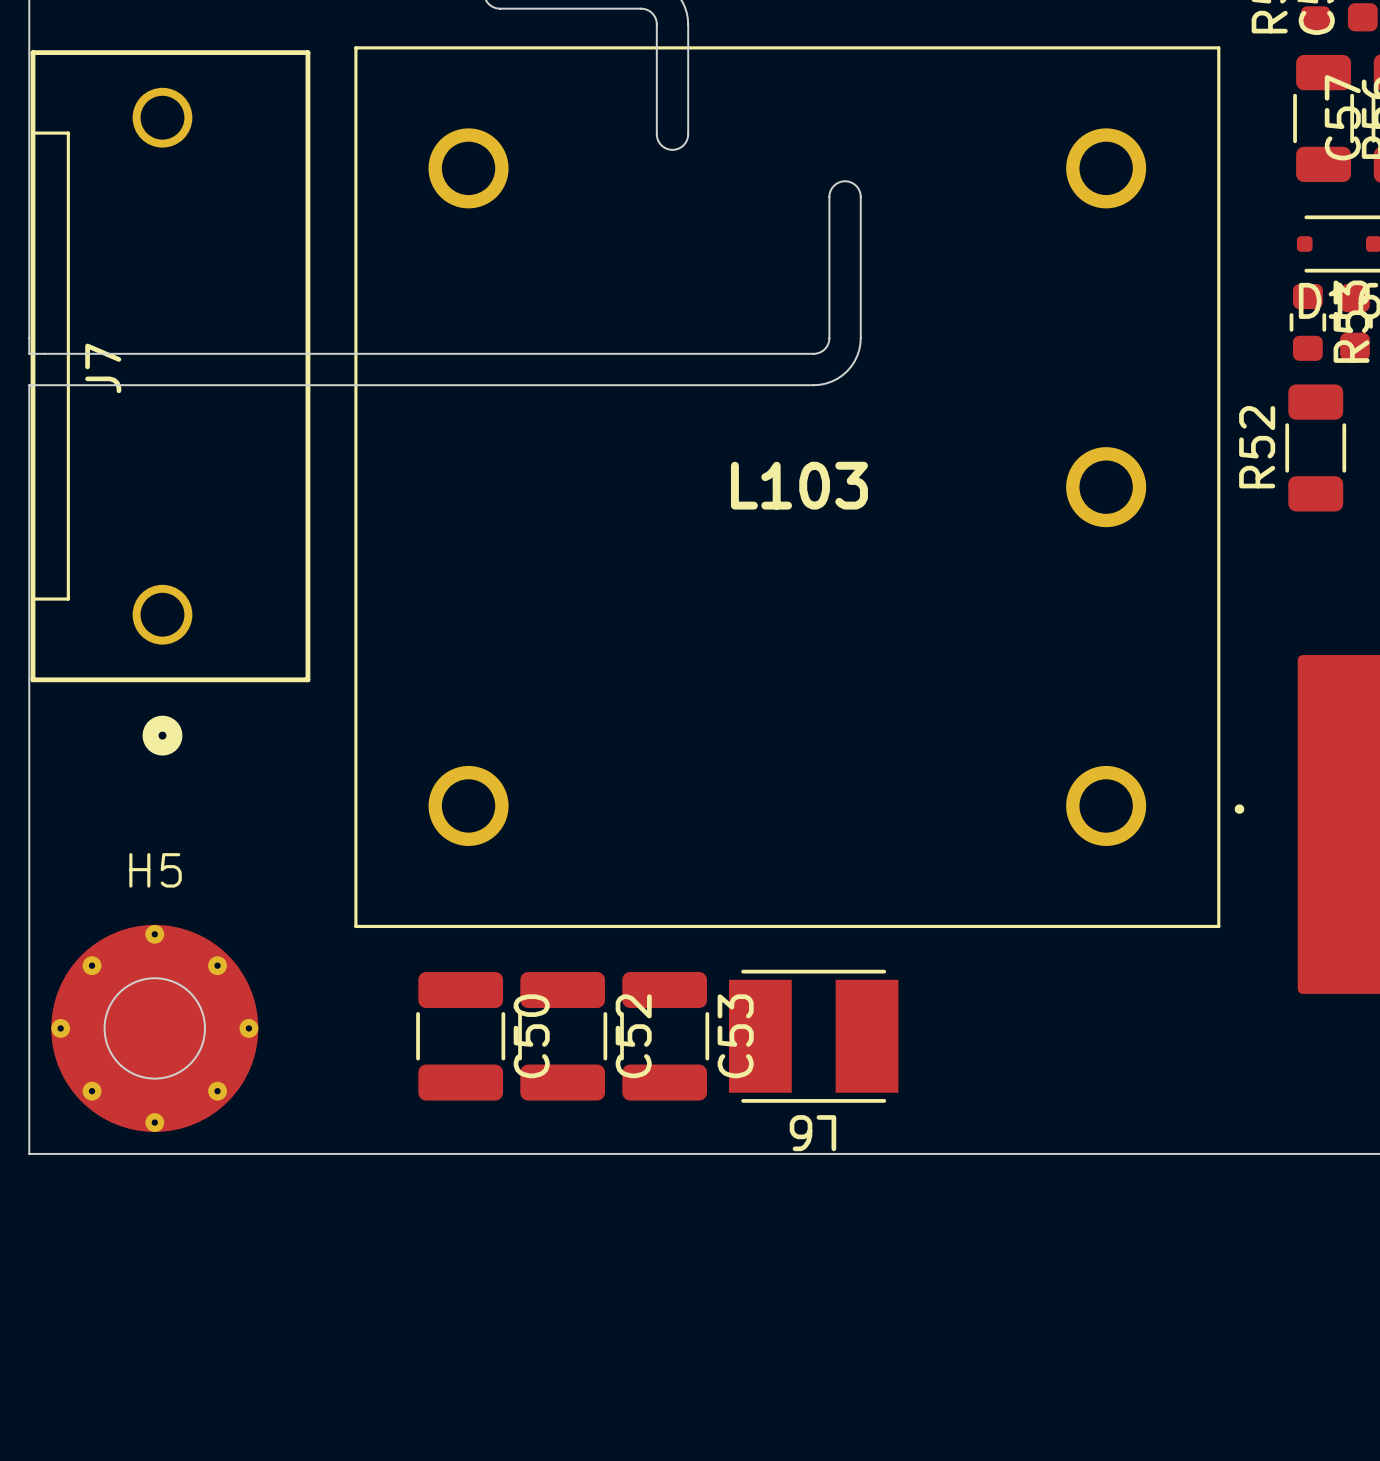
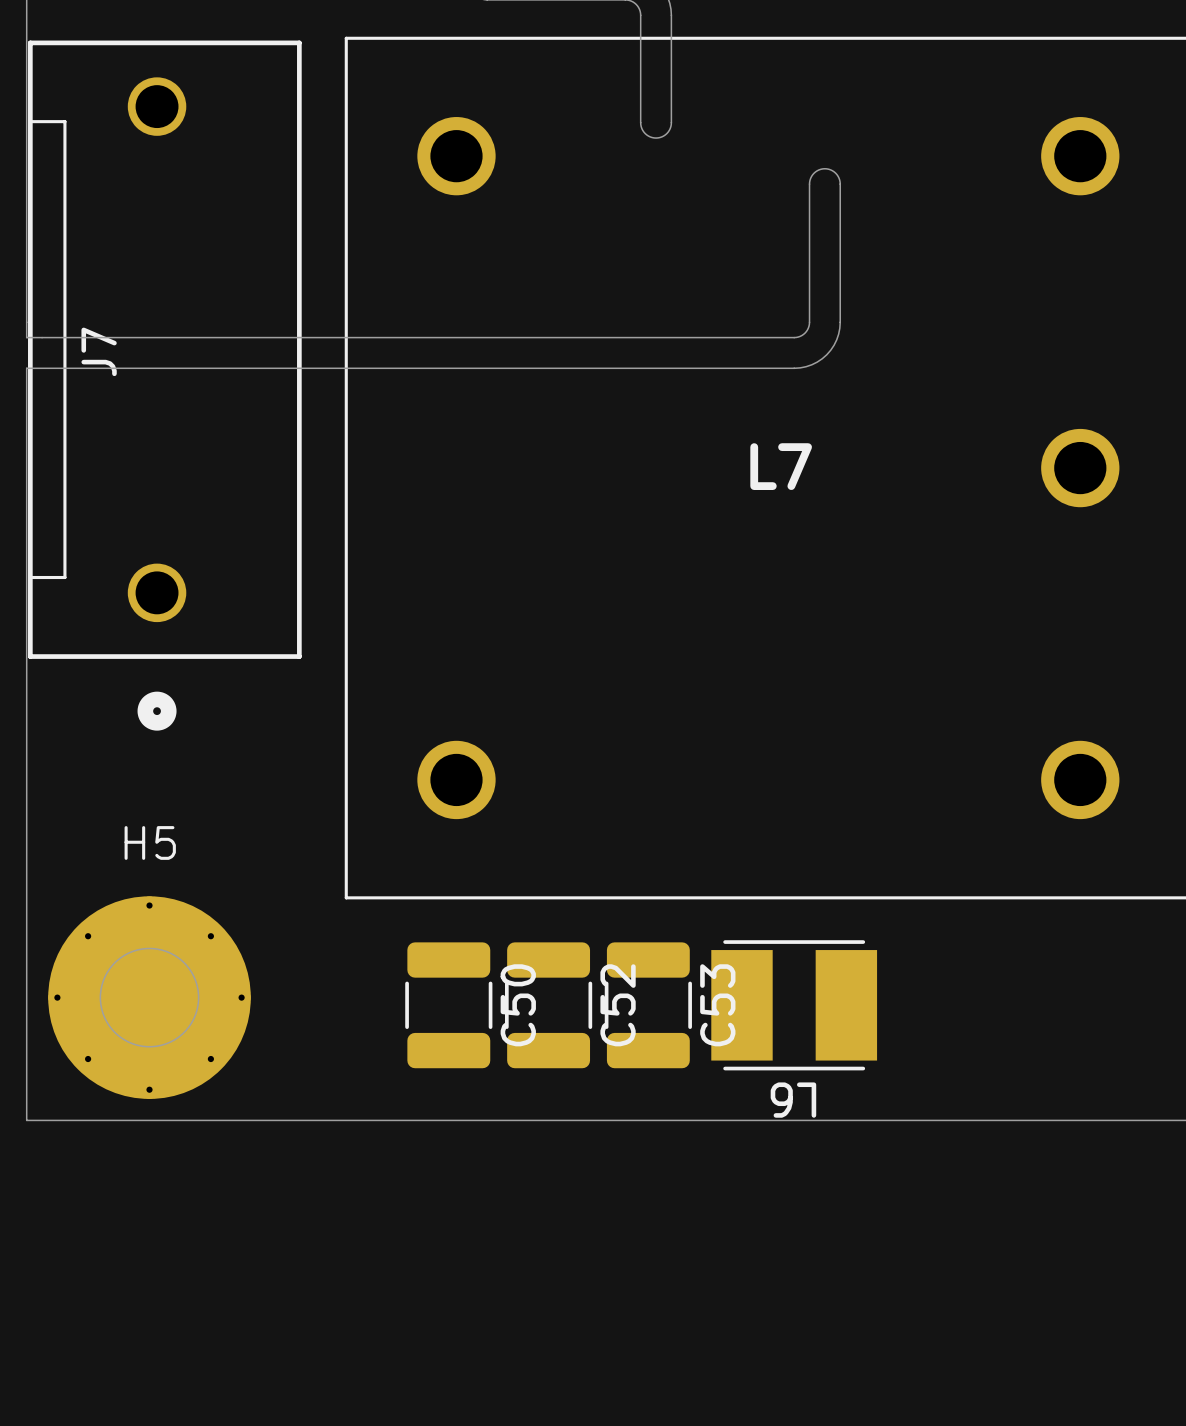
L103 name: L103 (799, 485) -> L7 (781, 466)

